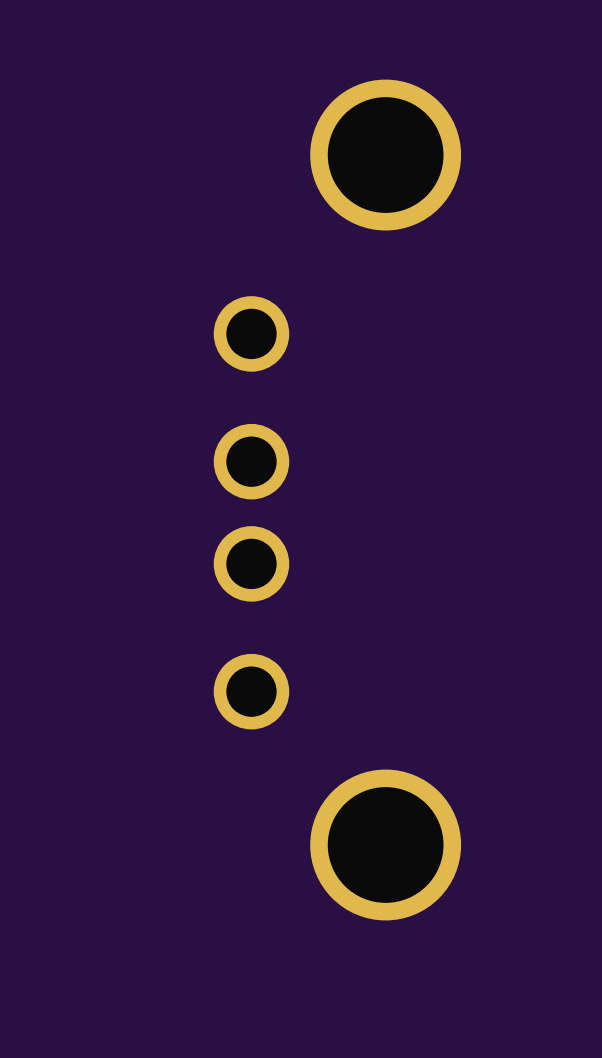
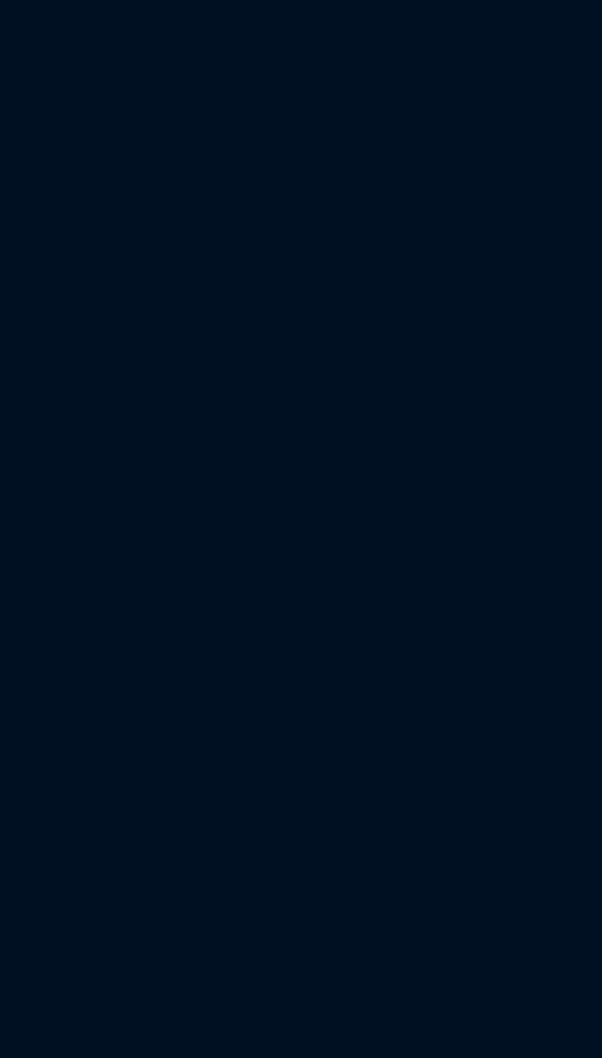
part: (337, 500) -> none

